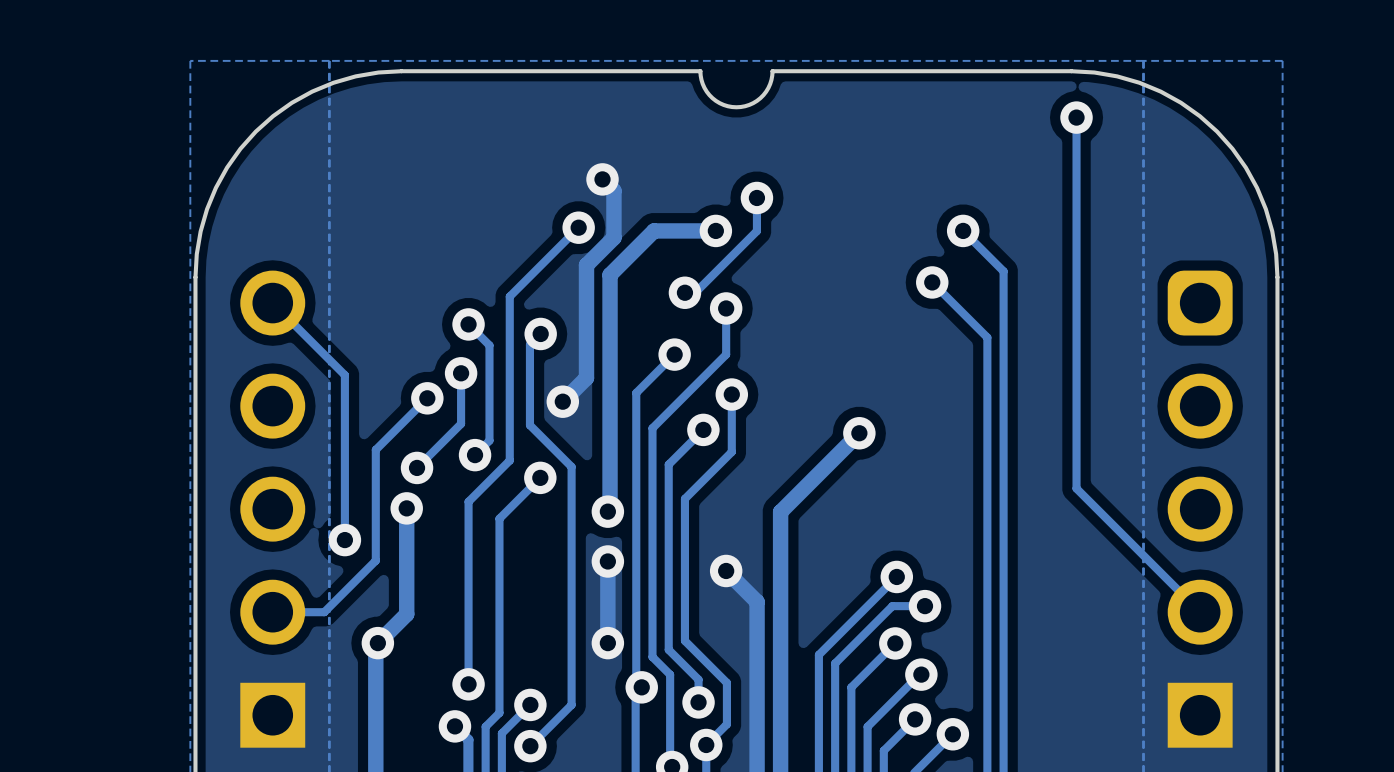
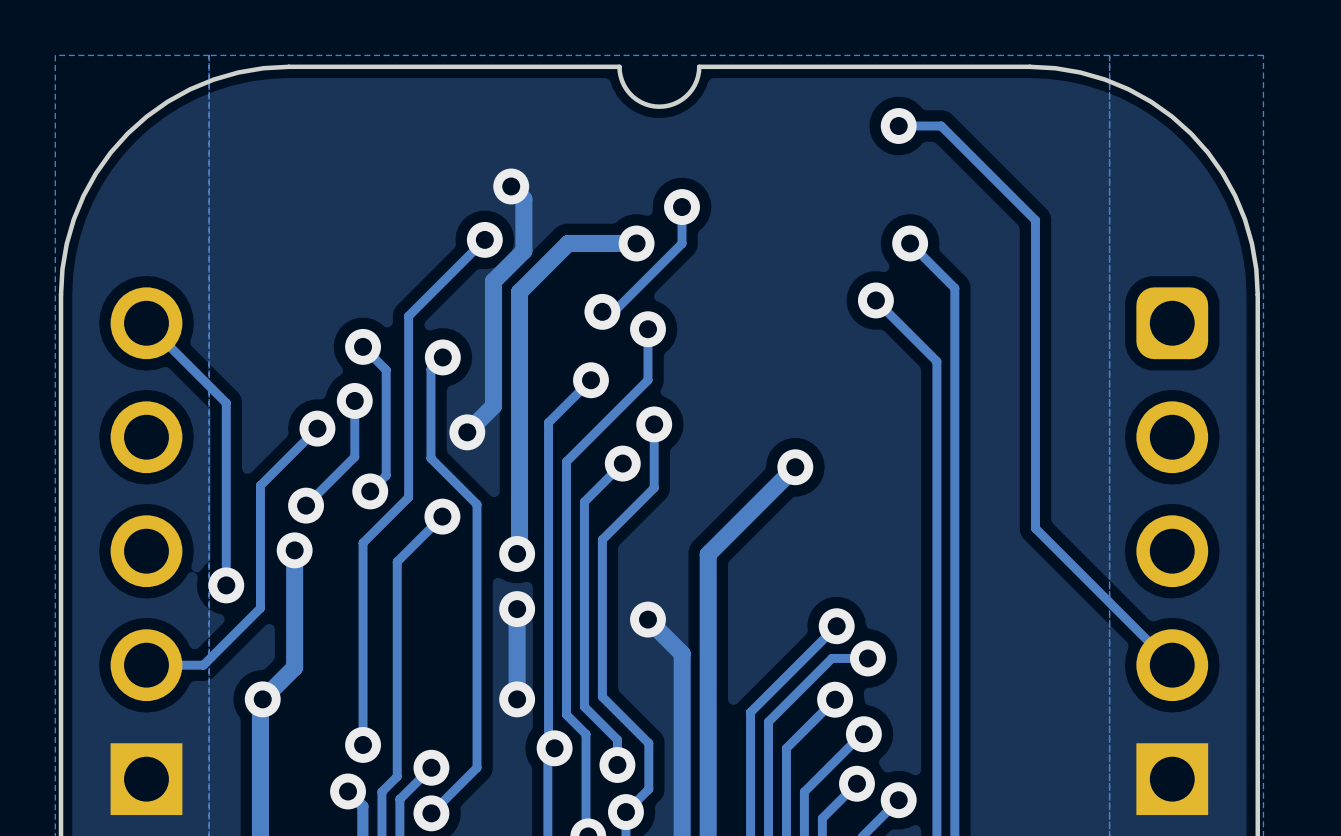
track: (1076, 117) (1076, 209) -> (898, 126) (941, 126) (1035, 220)
via position: (1076, 117) -> (898, 126)

